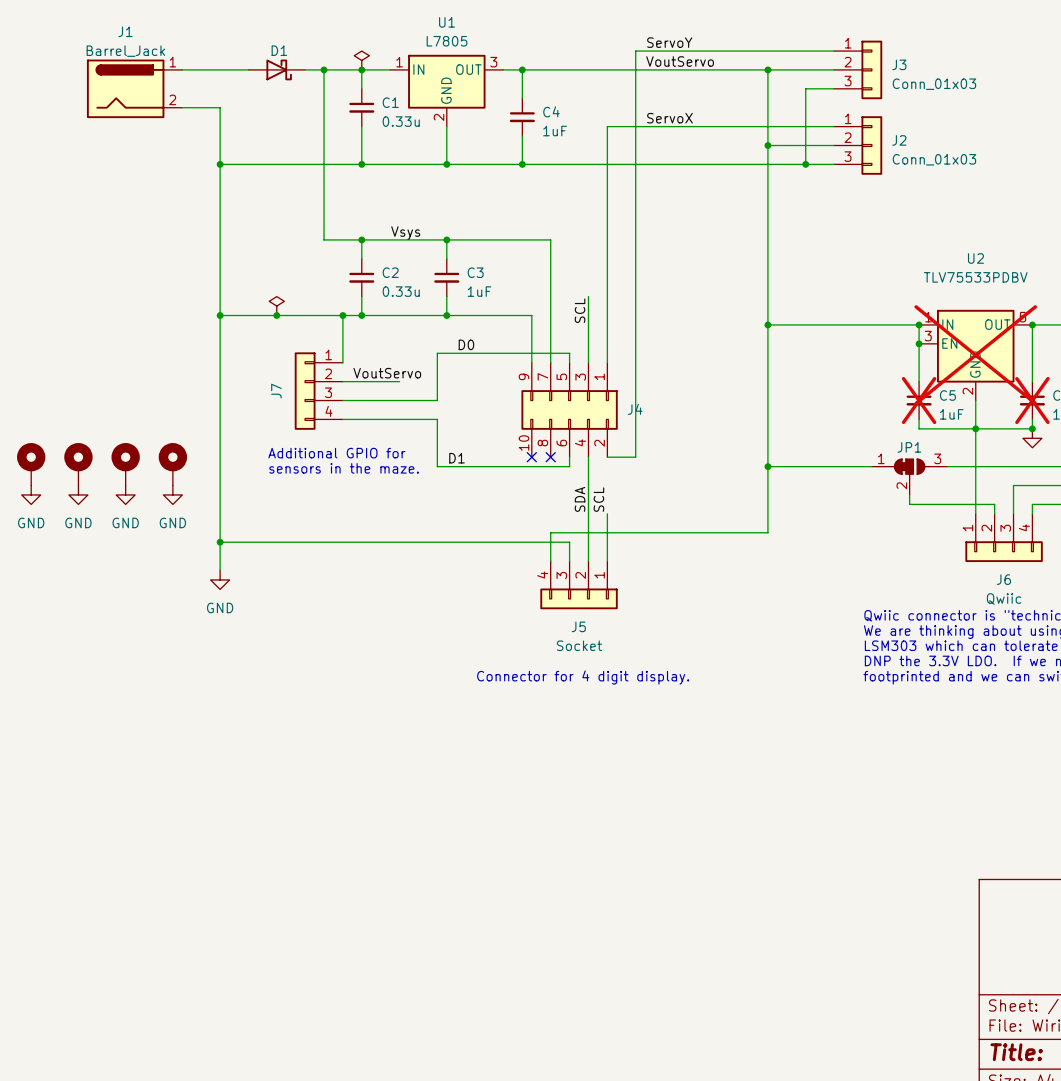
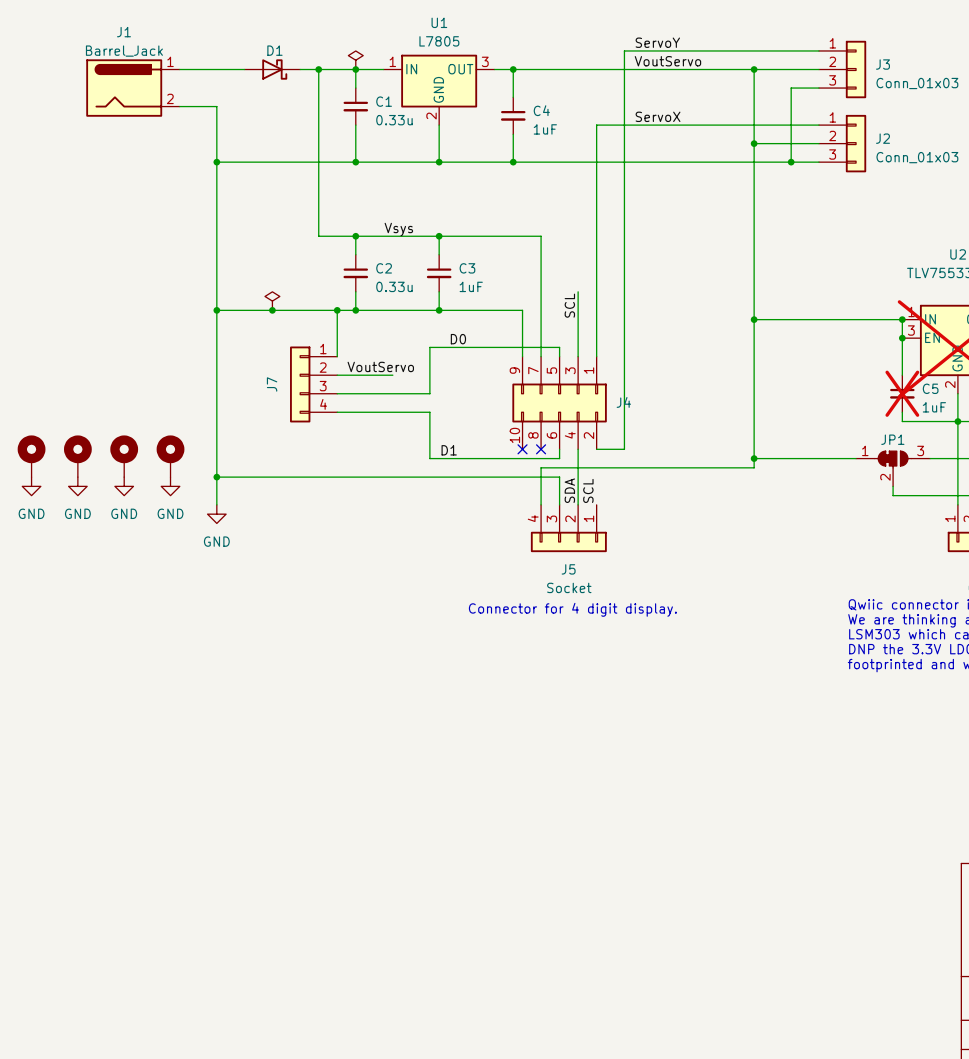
text: Additional GPIO for (336, 453) -> none
text: sensors in the maze. (344, 468) -> none
wire: (767, 476) (767, 532) (550, 532) (550, 561) -> (754, 467) (541, 467) (541, 504)
wire: none -> (216, 477) (559, 477) (559, 504)
junction: none -> (216, 477)
wire: (220, 513) (220, 570) -> none
wire: (220, 542) (569, 542) (569, 561) -> none
junction: (220, 542) -> none
power symbol position: GND (220, 579) -> GND (216, 514)
J5 position: (579, 585) -> (568, 528)
text position: Connector for 4 digit display. (583, 677) -> Connector for 4 digit display. (572, 609)

